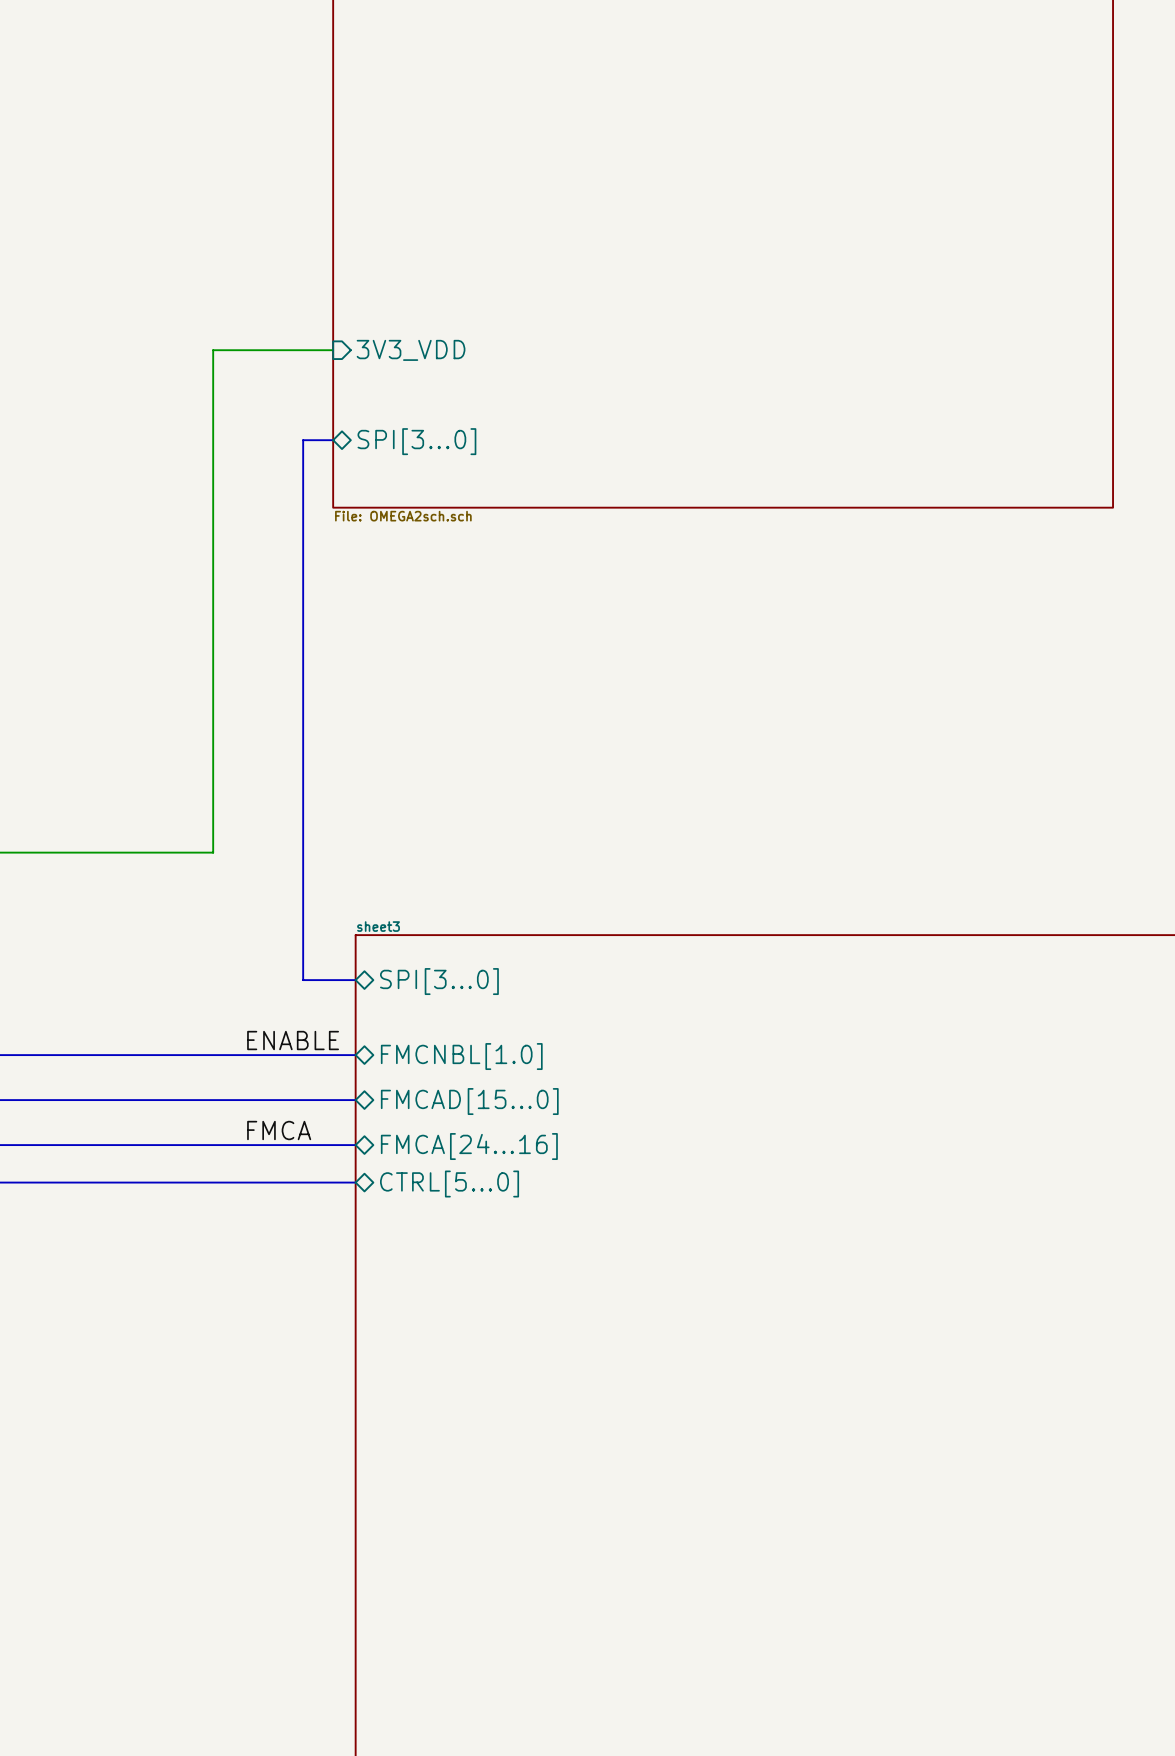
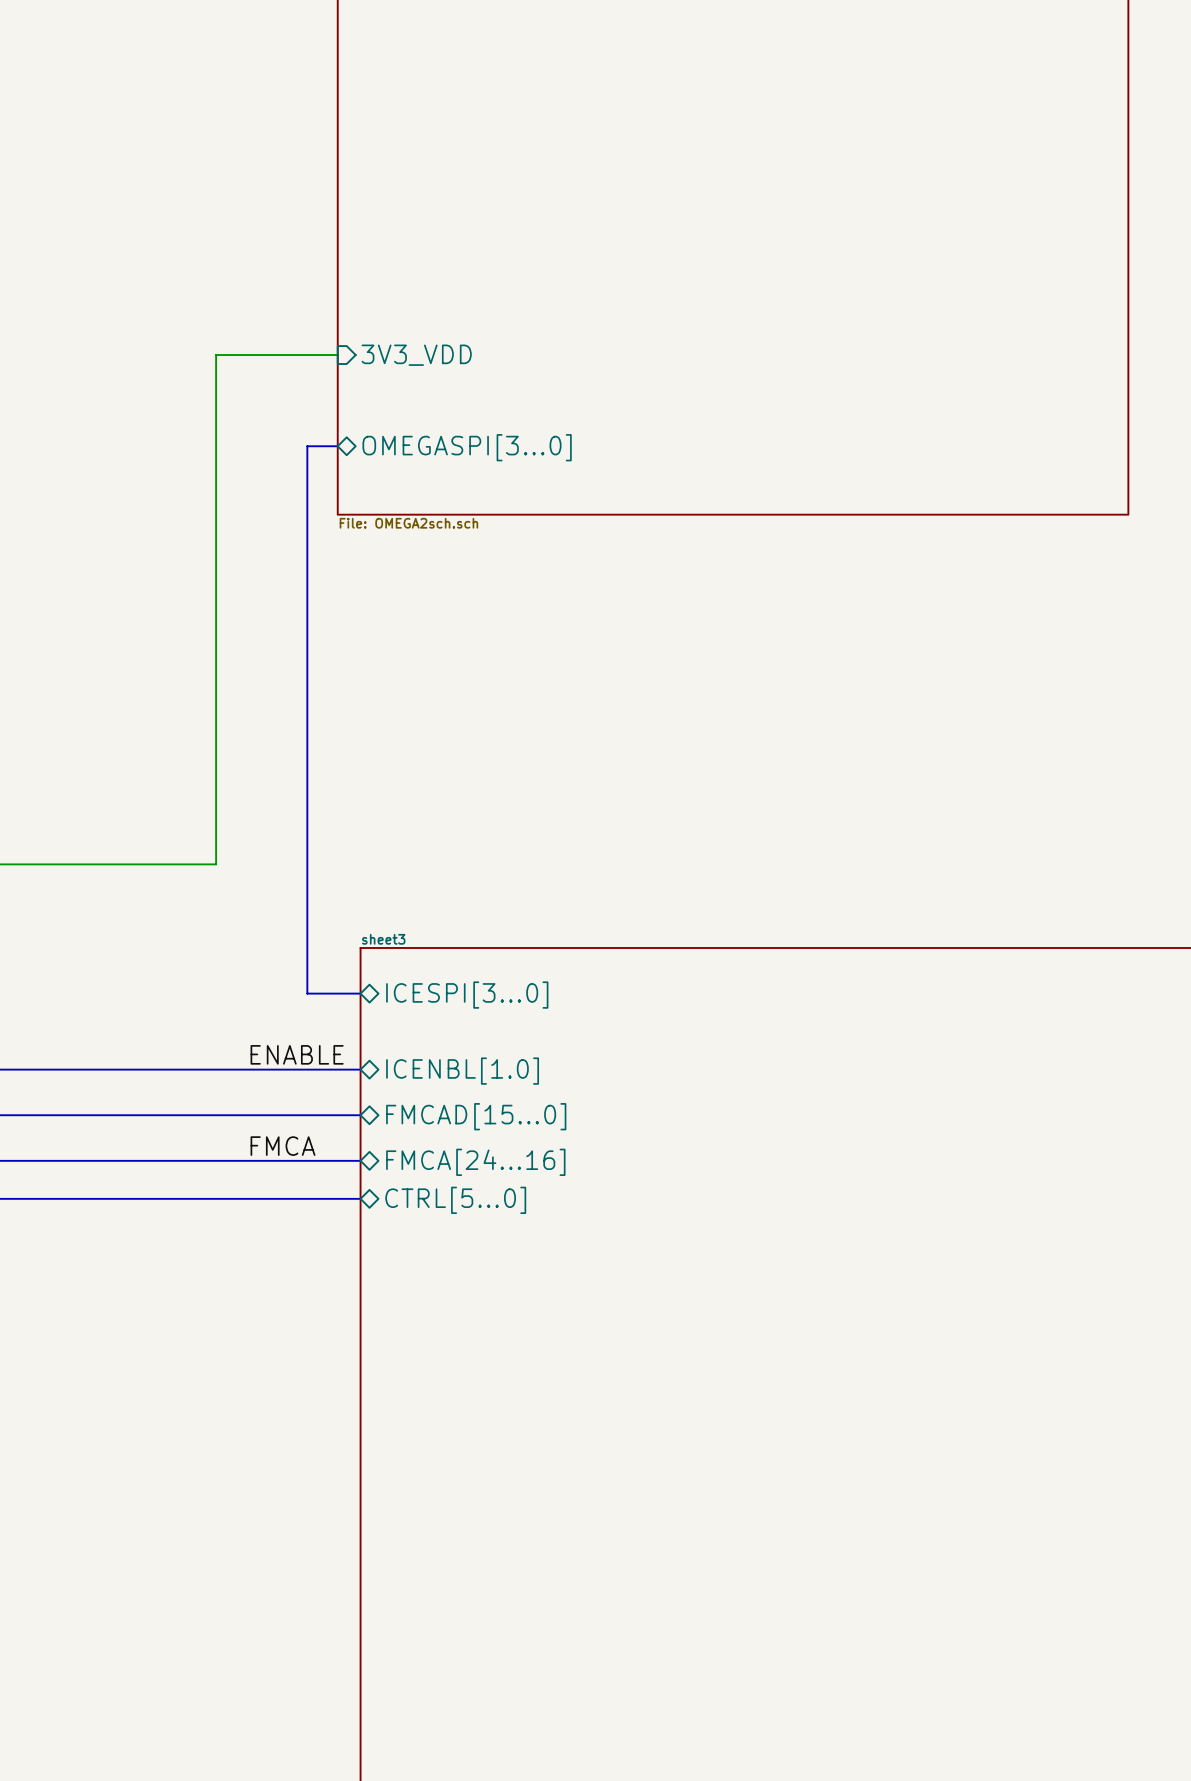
sheet pin: SPI[3...0] (416, 441) -> OMEGASPI[3...0] (467, 447)
sheet pin: SPI[3...0] (439, 981) -> ICESPI[3...0] (467, 995)
sheet pin: FMCNBL[1.0] (461, 1056) -> ICENBL[1.0] (462, 1071)

